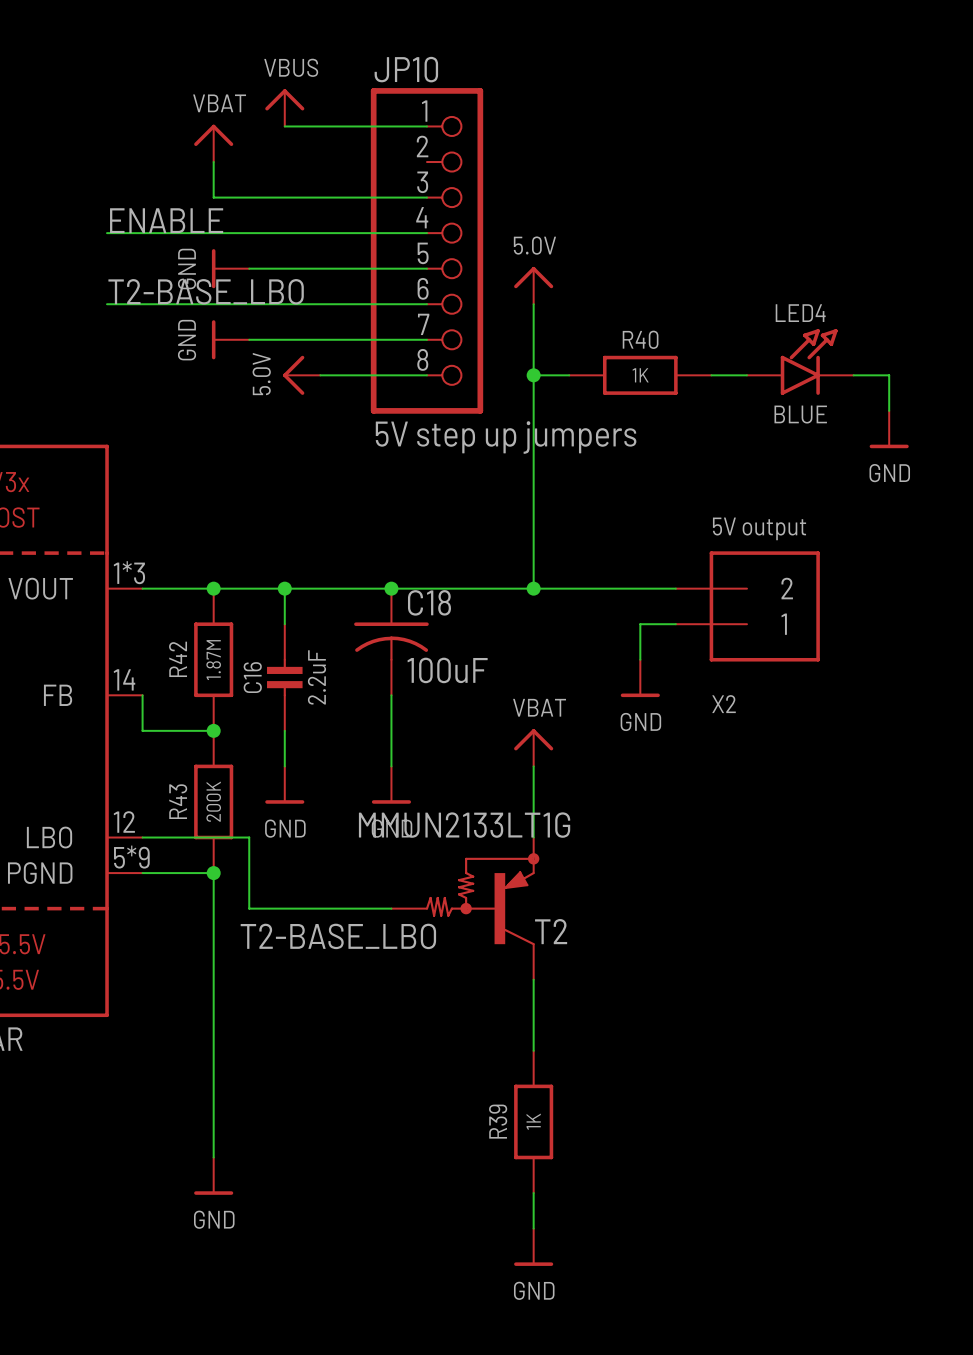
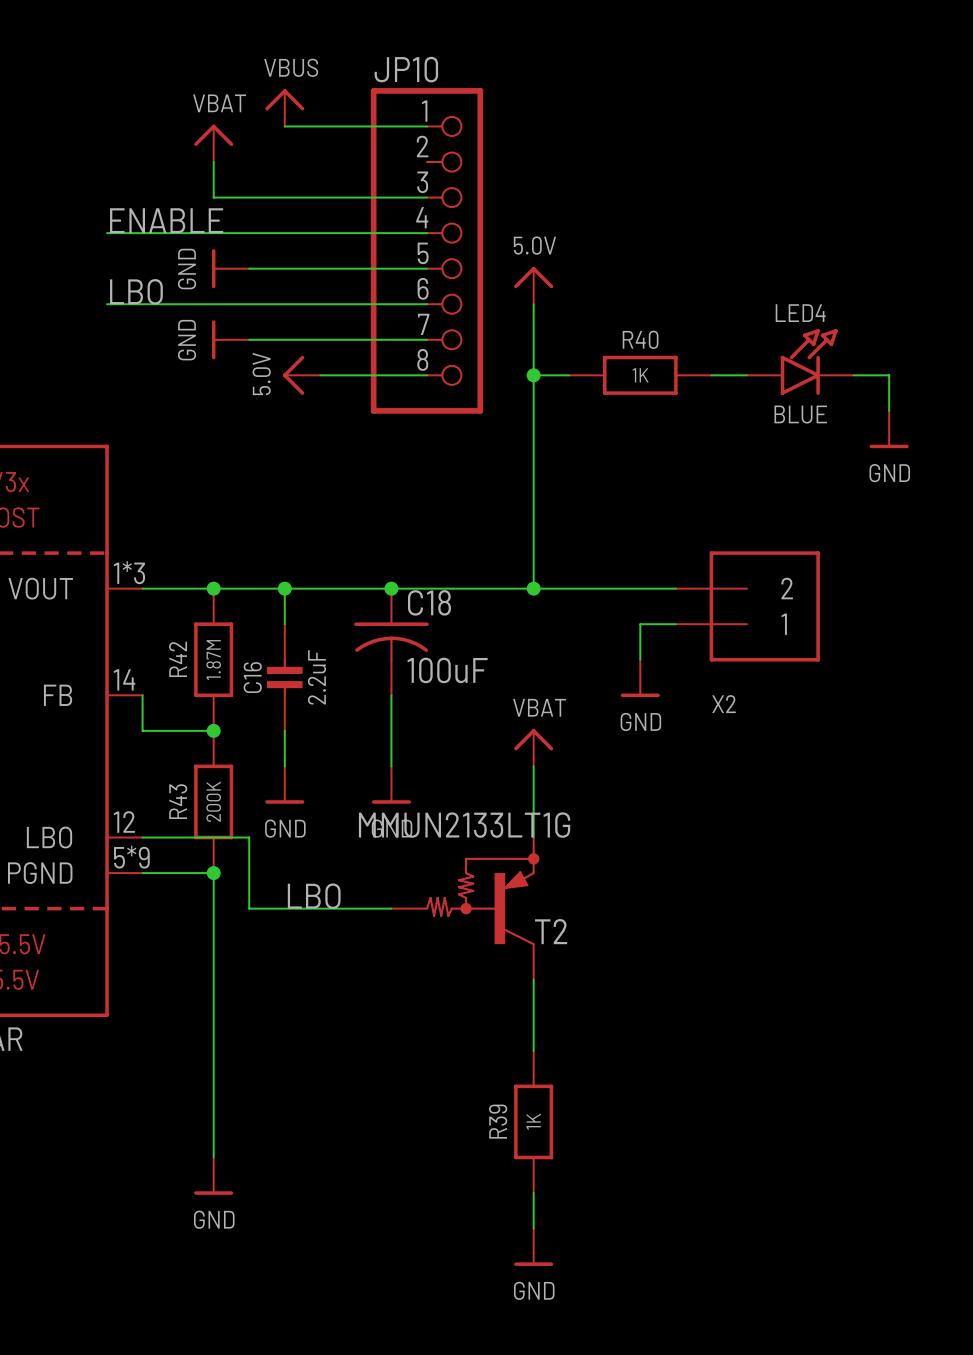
label: T2-BASE_LBO (206, 291) -> LBO (136, 291)
JP10 value: 5V step up jumpers (506, 437) -> none
X2 value: 5V output (759, 528) -> none
label: none -> LBO (314, 896)
label: T2-BASE_LBO (338, 936) -> none

